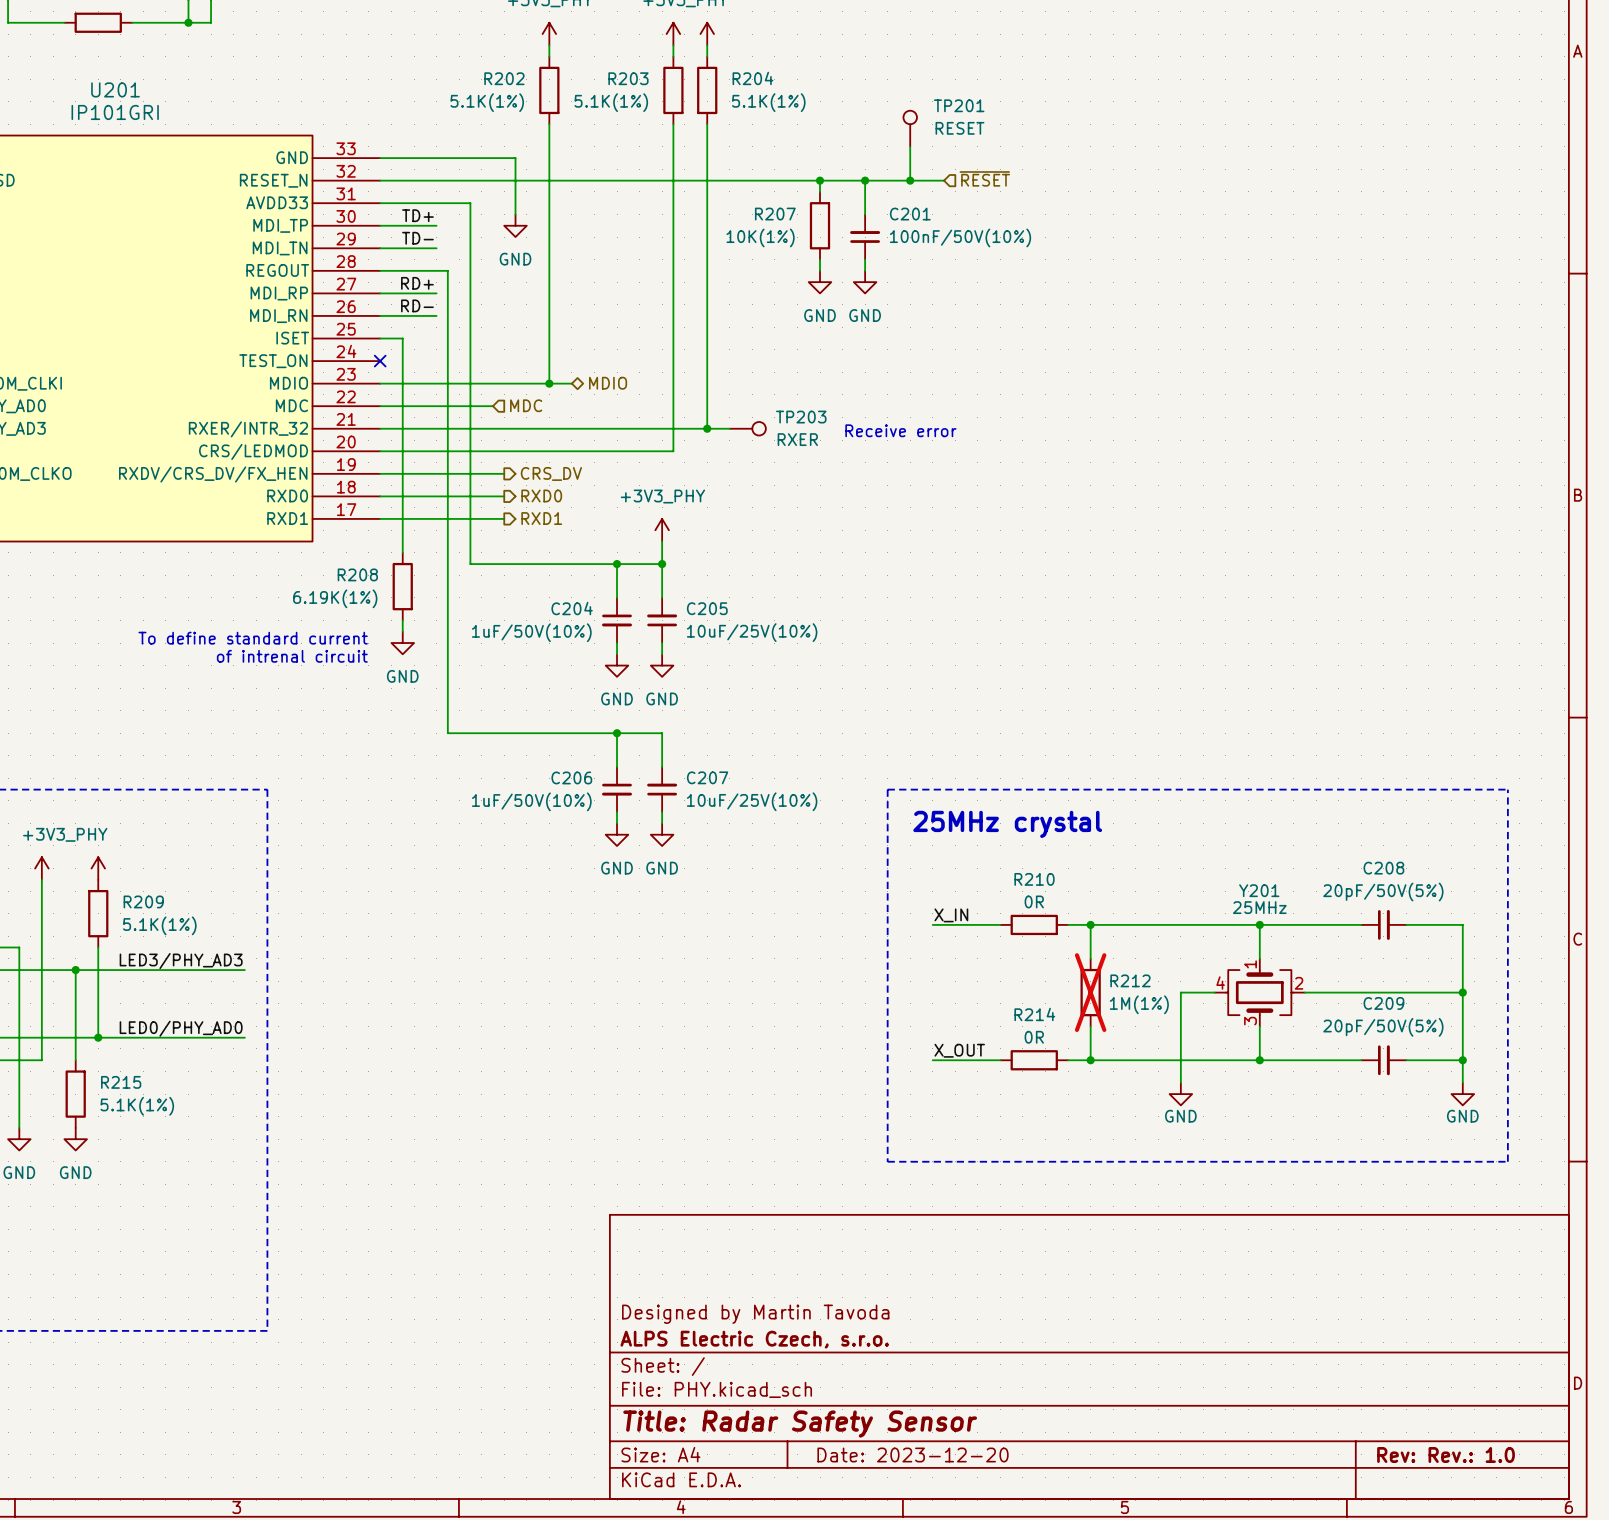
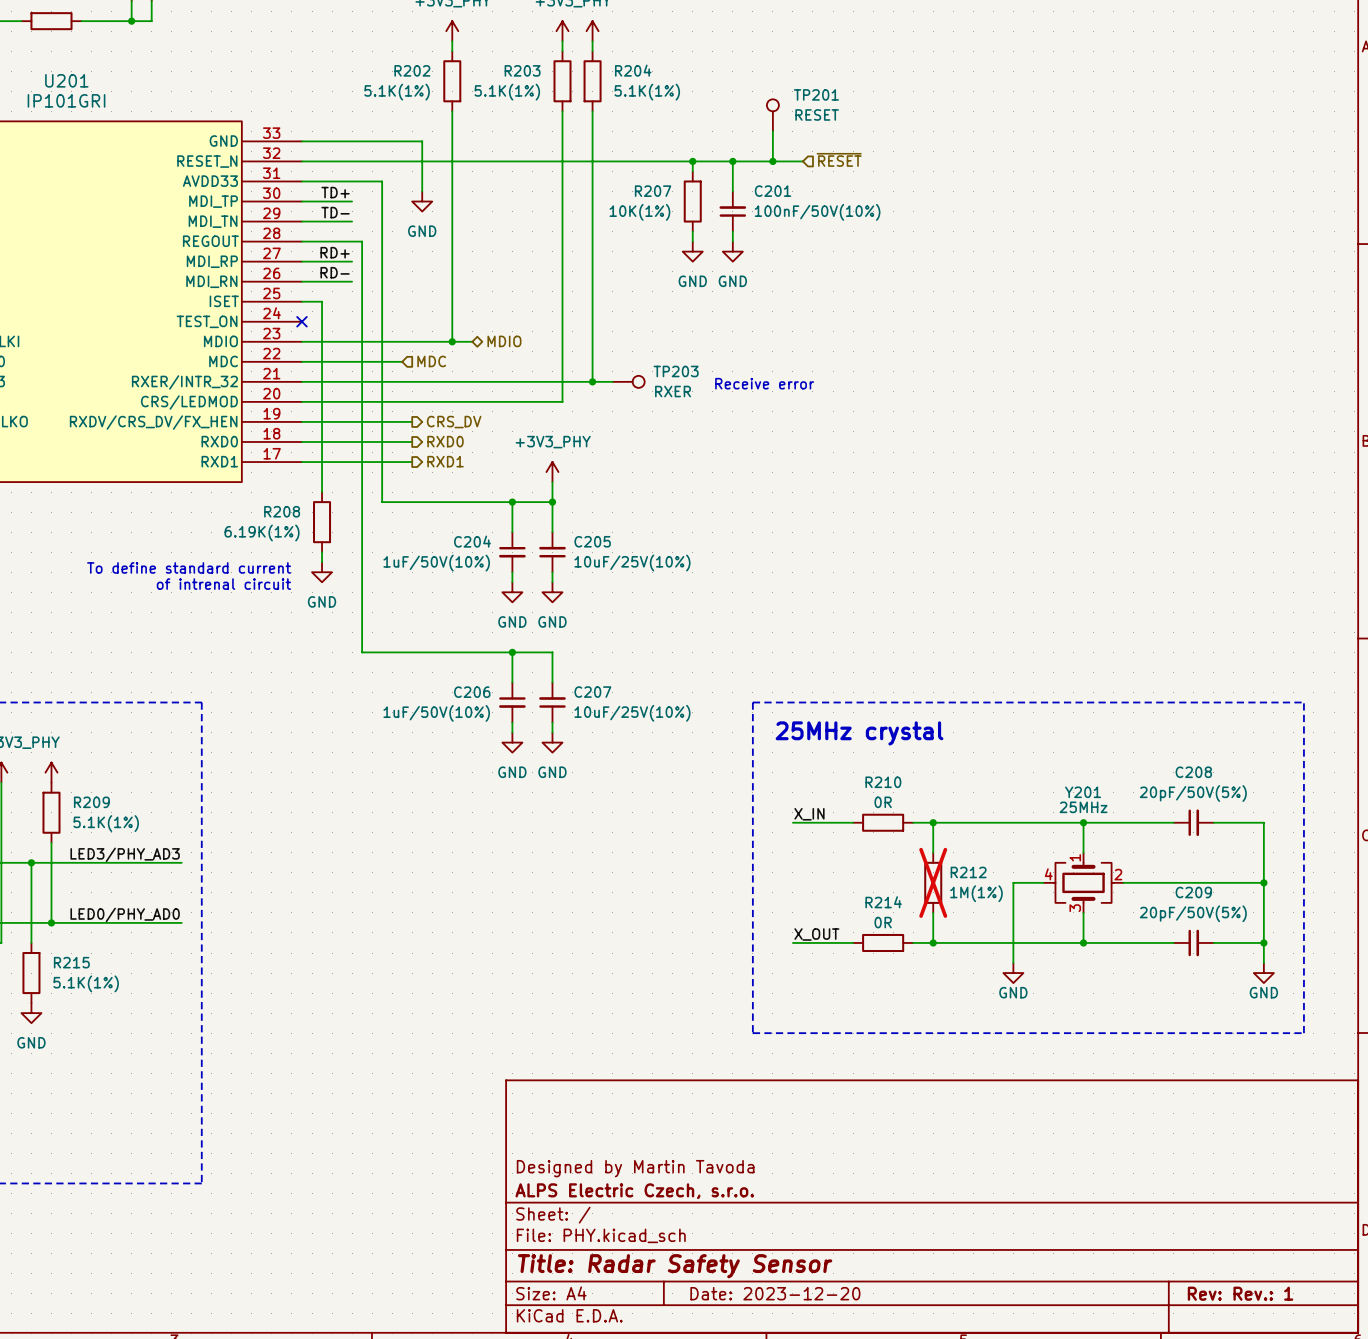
title block: Rev: Rev.: 1.0 (1446, 1454) -> Rev: Rev.: 1 (1240, 1293)

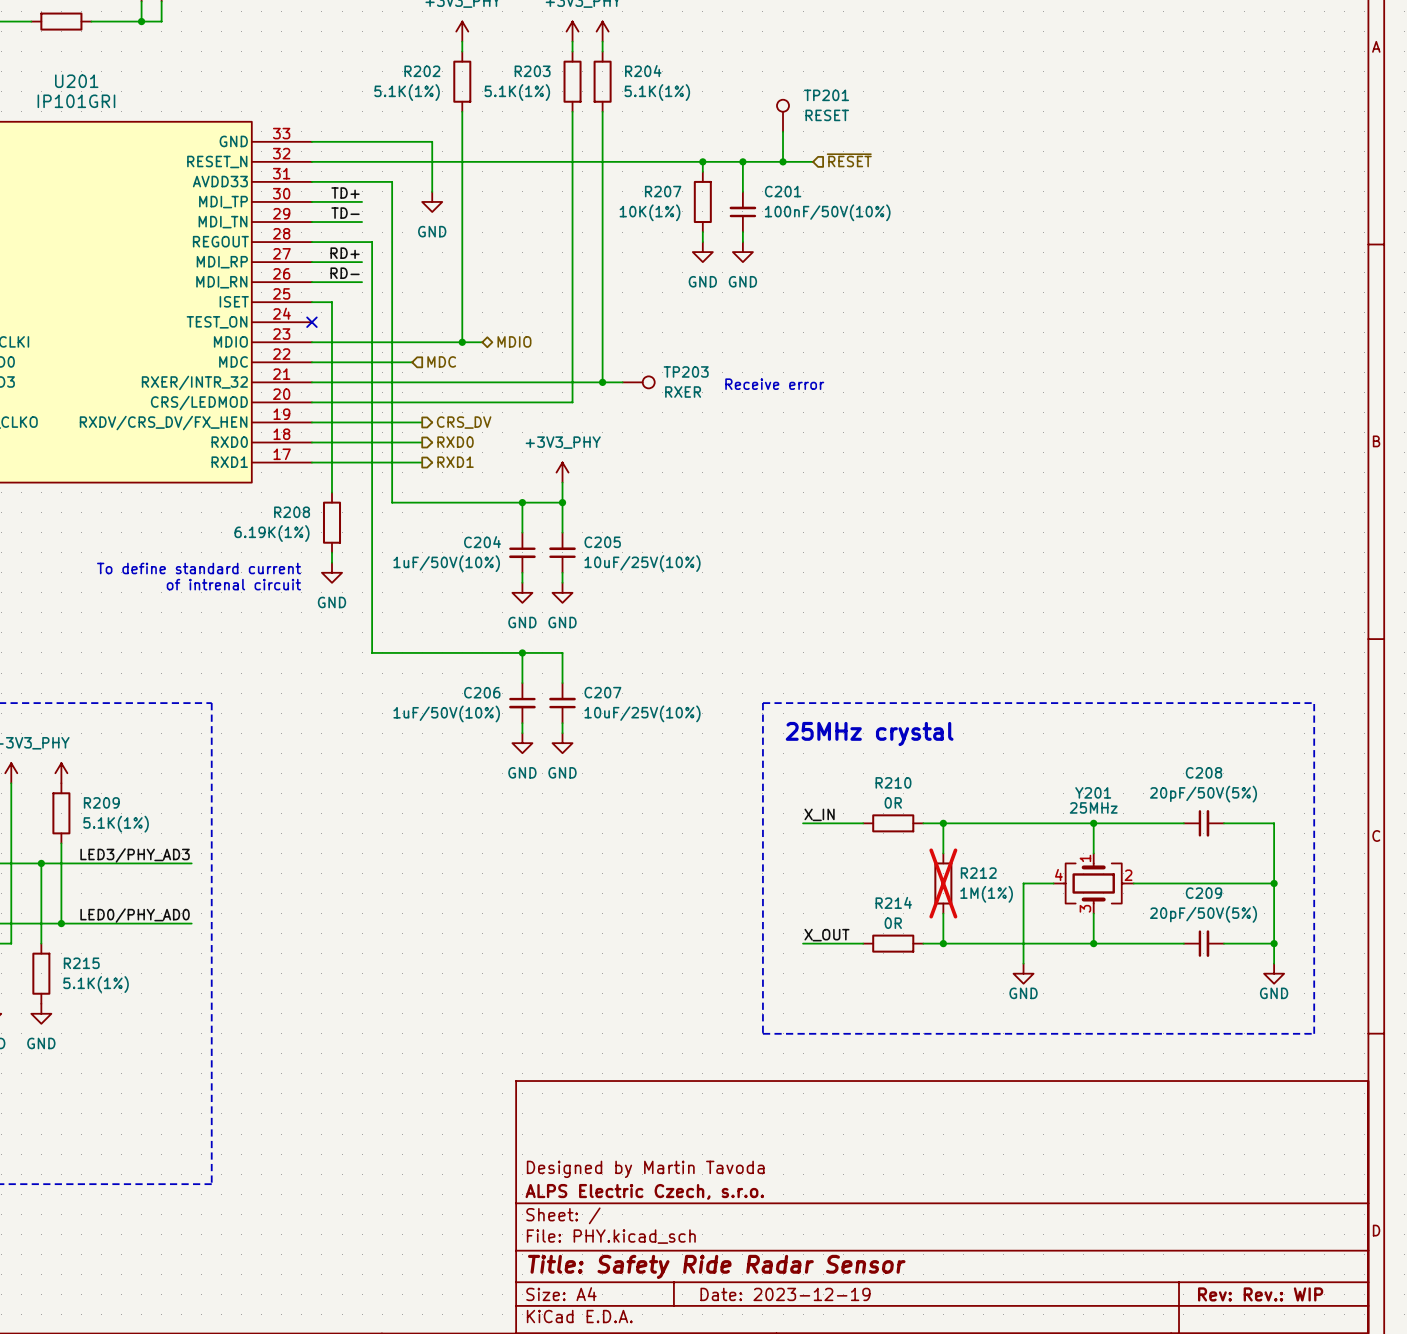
title block: Title: Radar Safety Sensor (675, 1266) -> Title: Safety Ride Radar Sensor (716, 1266)
title block: Date: 2023-12-20 (775, 1293) -> Date: 2023-12-19 (785, 1294)
title block: Rev: Rev.: 1 (1240, 1293) -> Rev: Rev.: WIP (1260, 1294)

